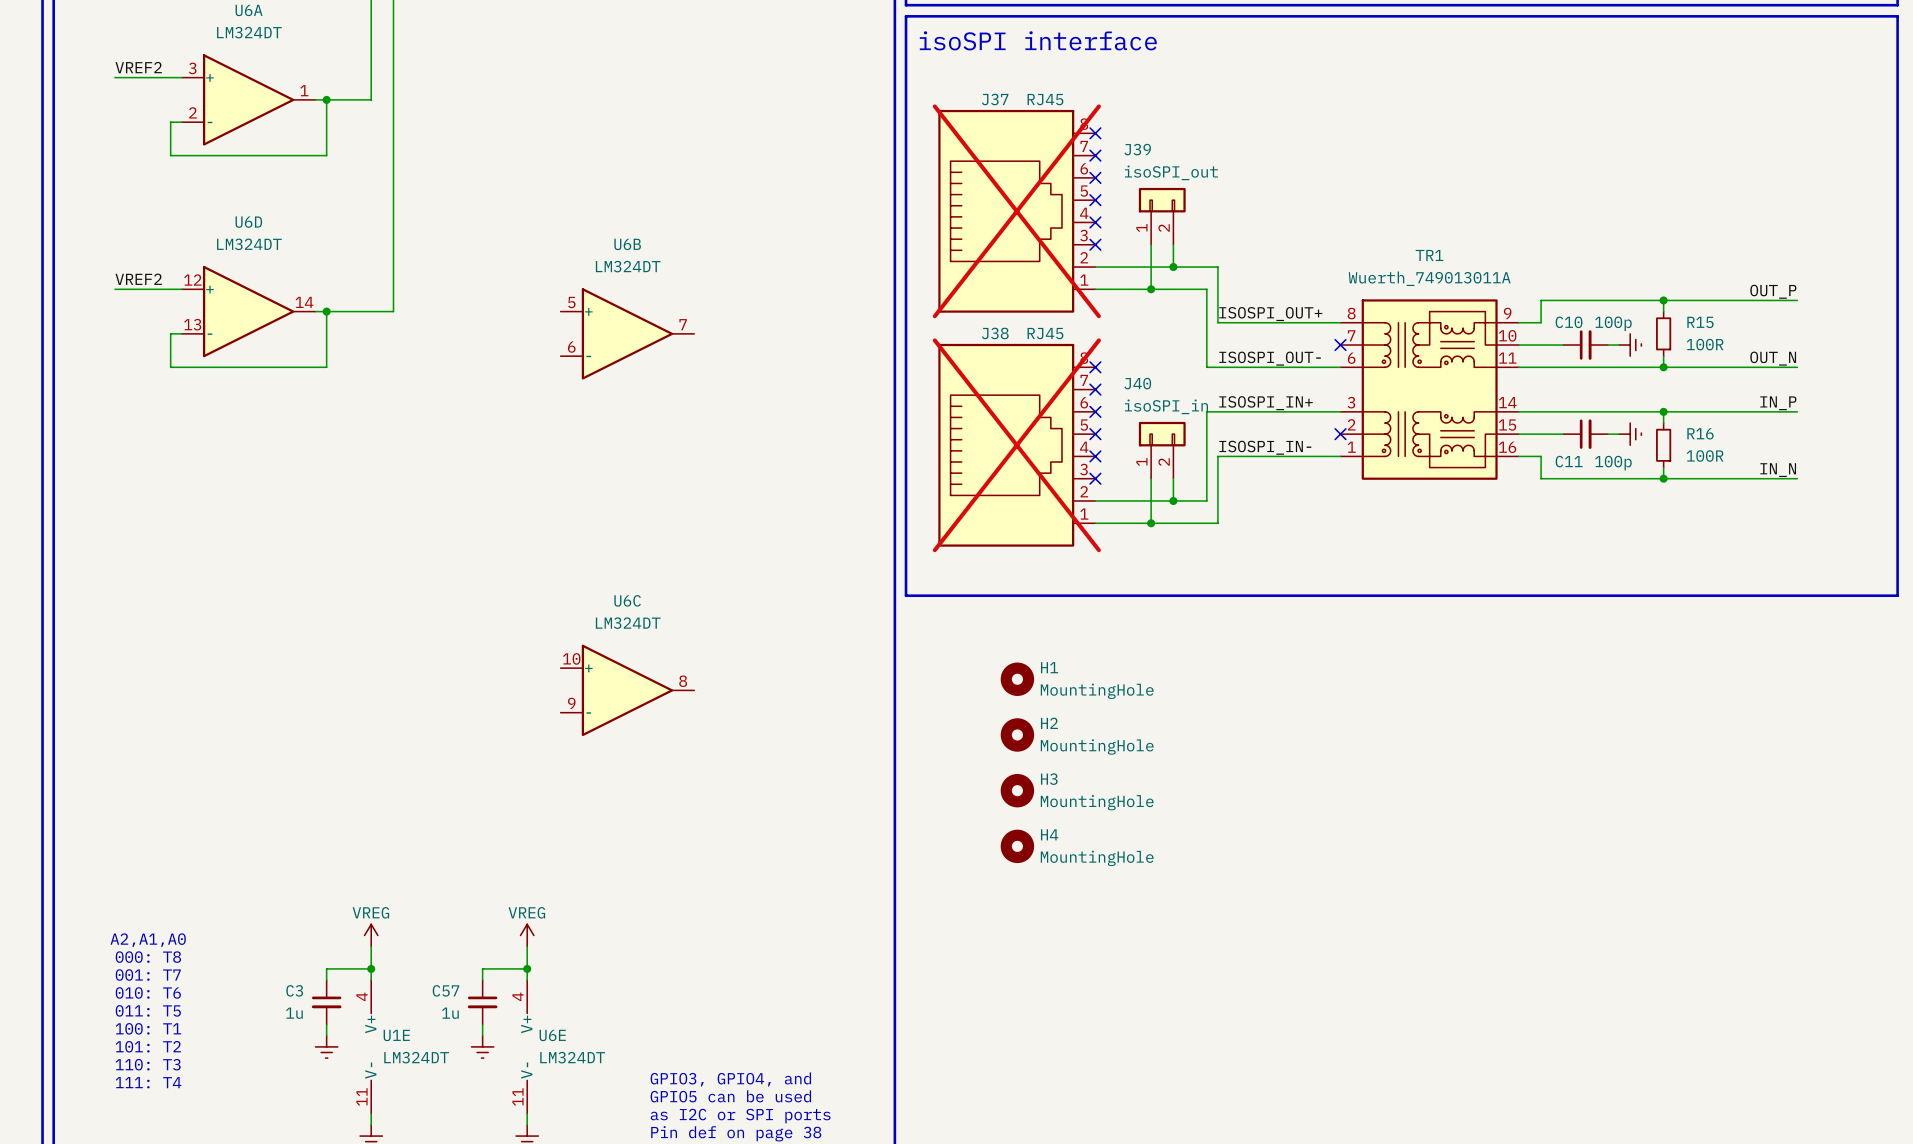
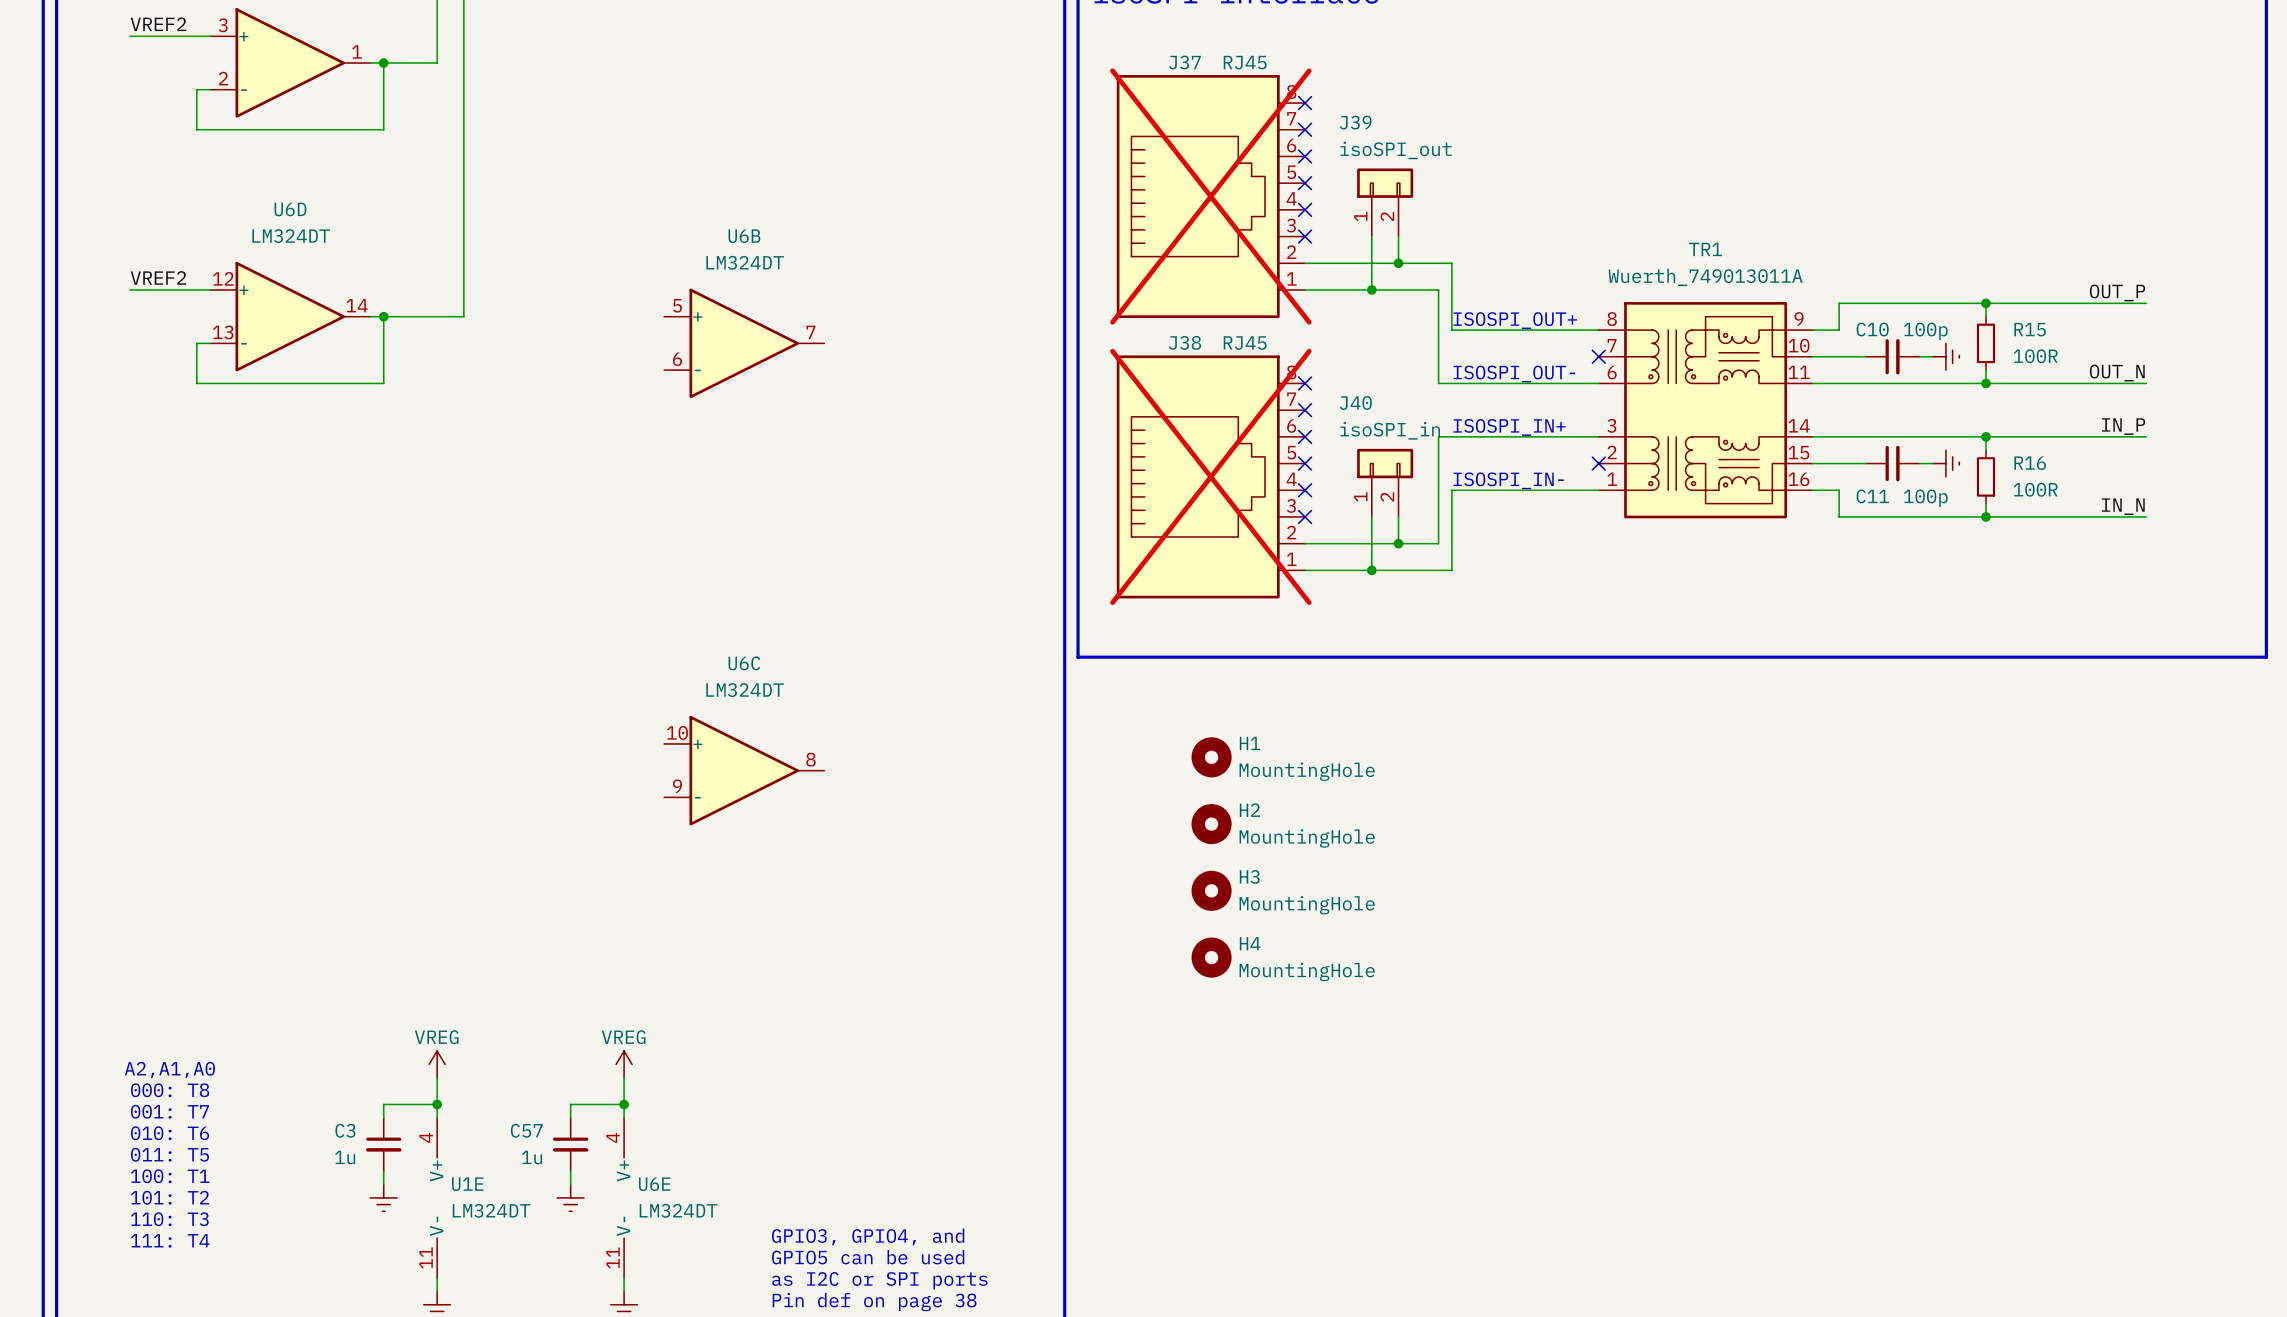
label: ISOSPI_OUT+ (1270, 314) -> none
text: none -> ISOSPI_OUT+ (1515, 320)
label: ISOSPI_OUT- (1270, 358) -> none
text: none -> ISOSPI_OUT- (1514, 374)
label: ISOSPI_IN+ (1266, 403) -> none
text: none -> ISOSPI_IN+ (1509, 427)
label: ISOSPI_IN- (1265, 447) -> none
text: none -> ISOSPI_IN- (1508, 480)

